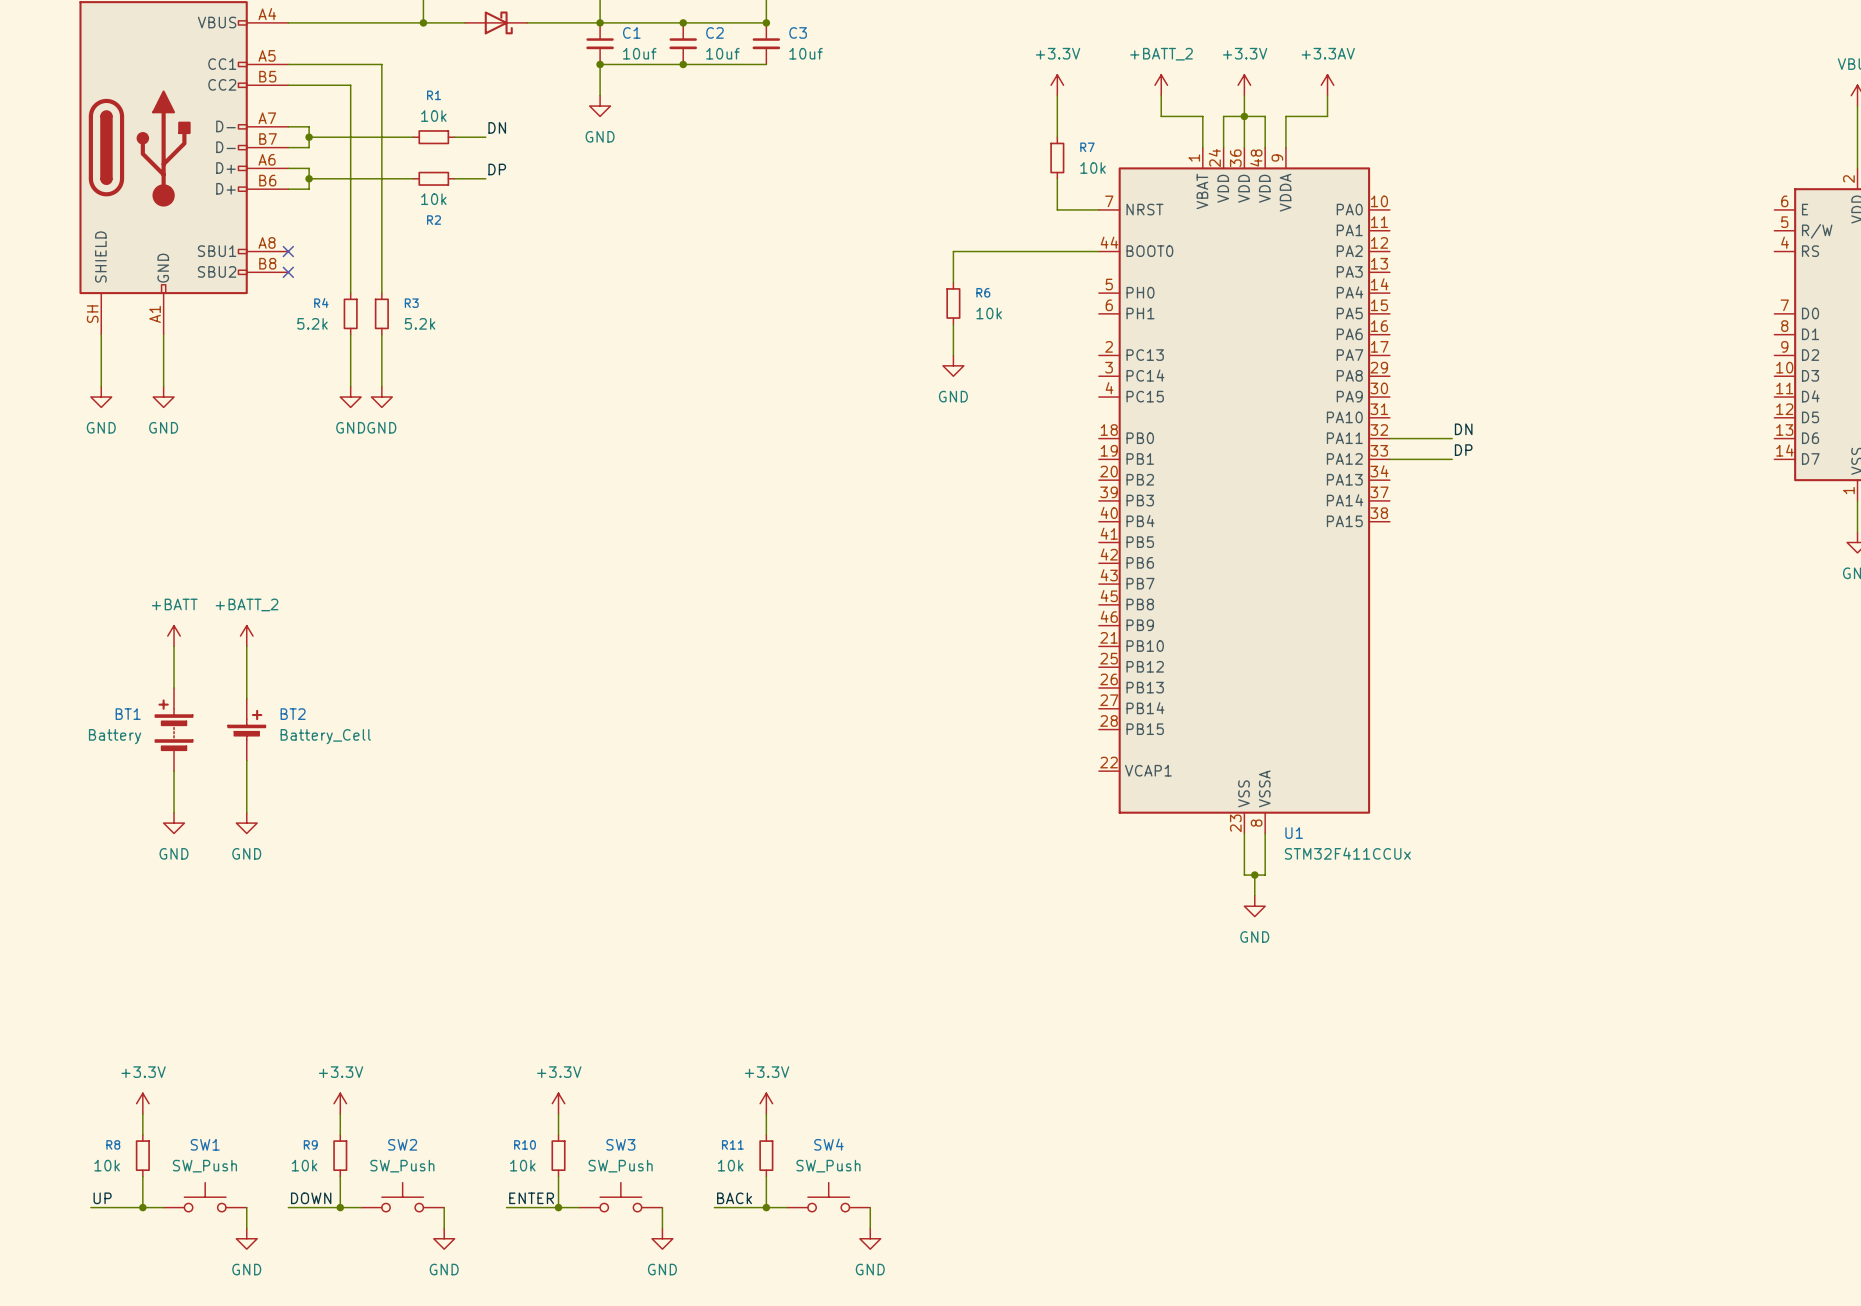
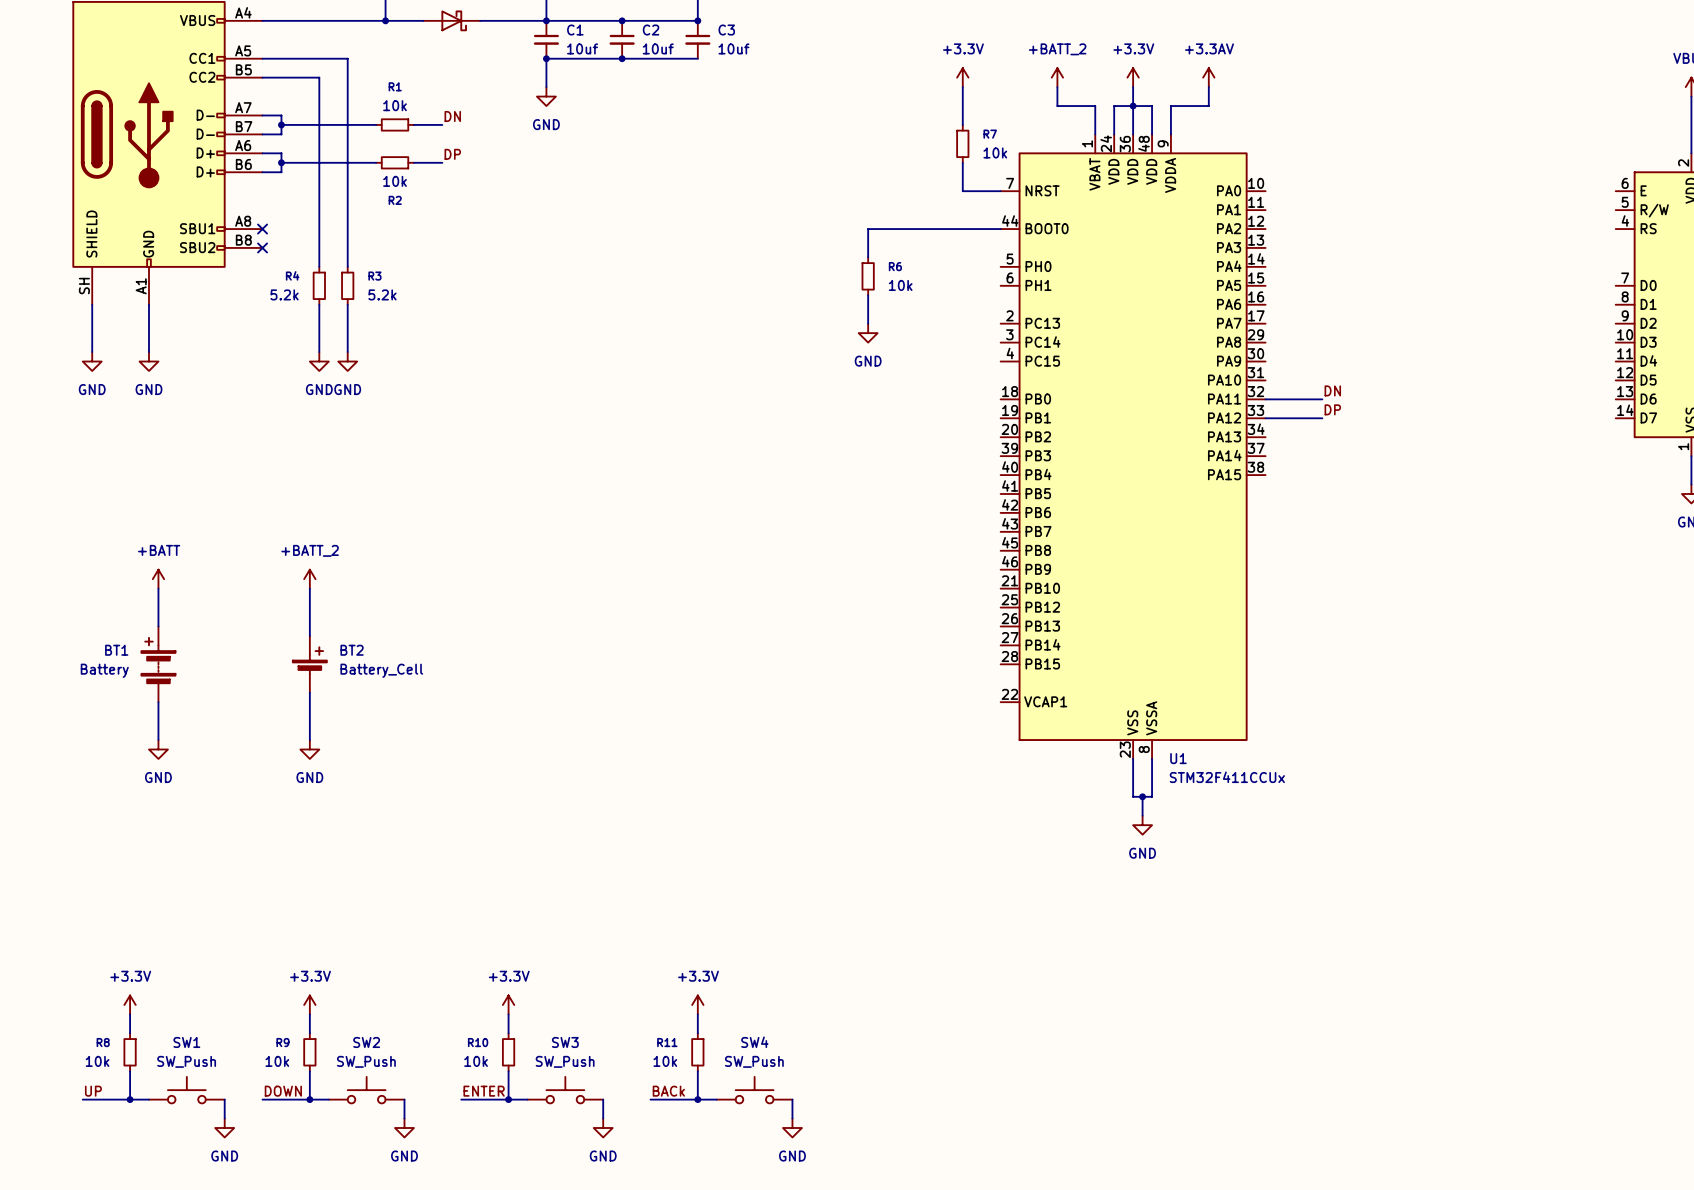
power symbol position: +BATT_2 (246, 636) -> +BATT_2 (309, 579)
wire: (246, 646) (246, 698) -> (309, 588) (309, 635)
BT2 position: (246, 729) -> (309, 664)
wire: (246, 760) (246, 812) -> (309, 692) (309, 740)
power symbol position: GND (246, 823) -> GND (309, 749)

